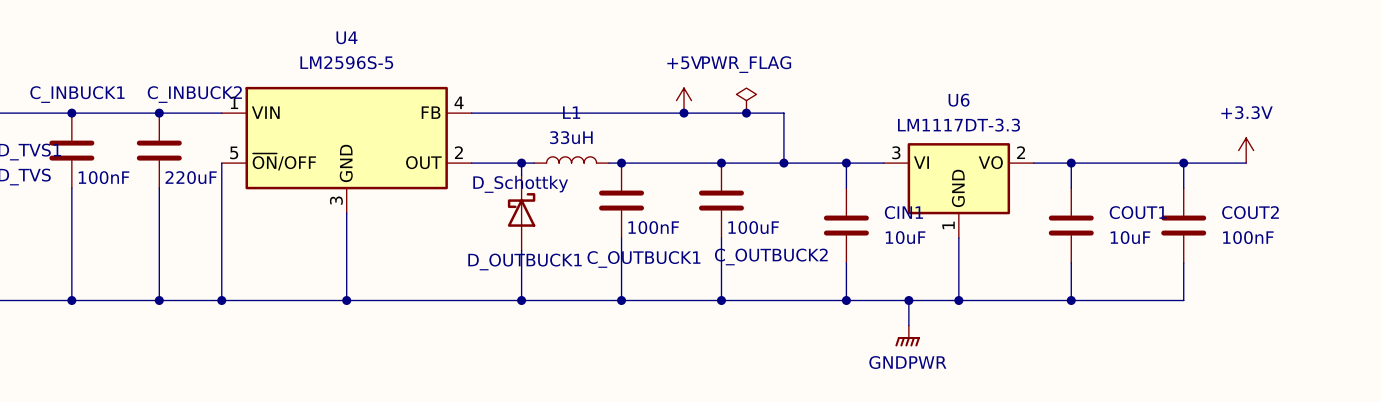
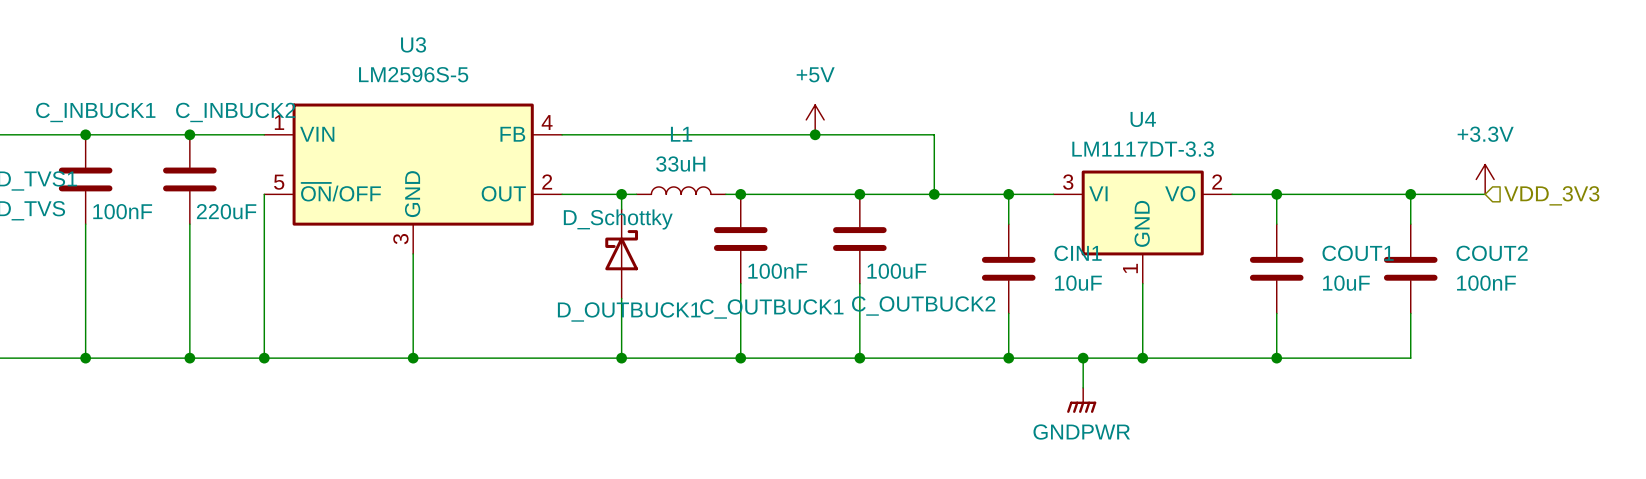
U4 name: U4 (346, 37) -> U3 (413, 44)
power symbol: PWR_FLAG (746, 100) -> none
U6 name: U6 (959, 100) -> U4 (1143, 119)
junction: (746, 113) -> none
hierarchical label: none -> VDD_3V3 (1551, 195)

